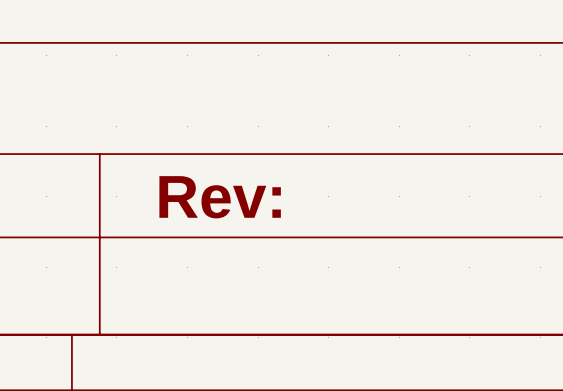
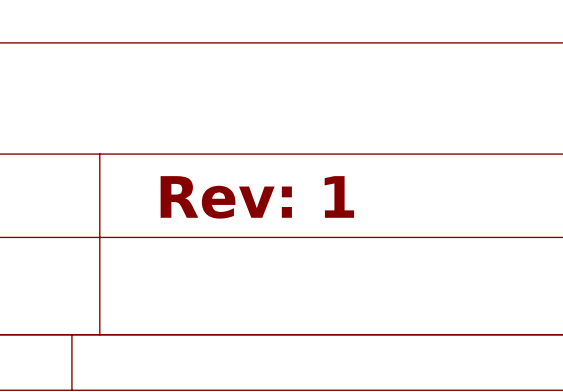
title block: Rev: (220, 197) -> Rev: 1 (257, 197)

